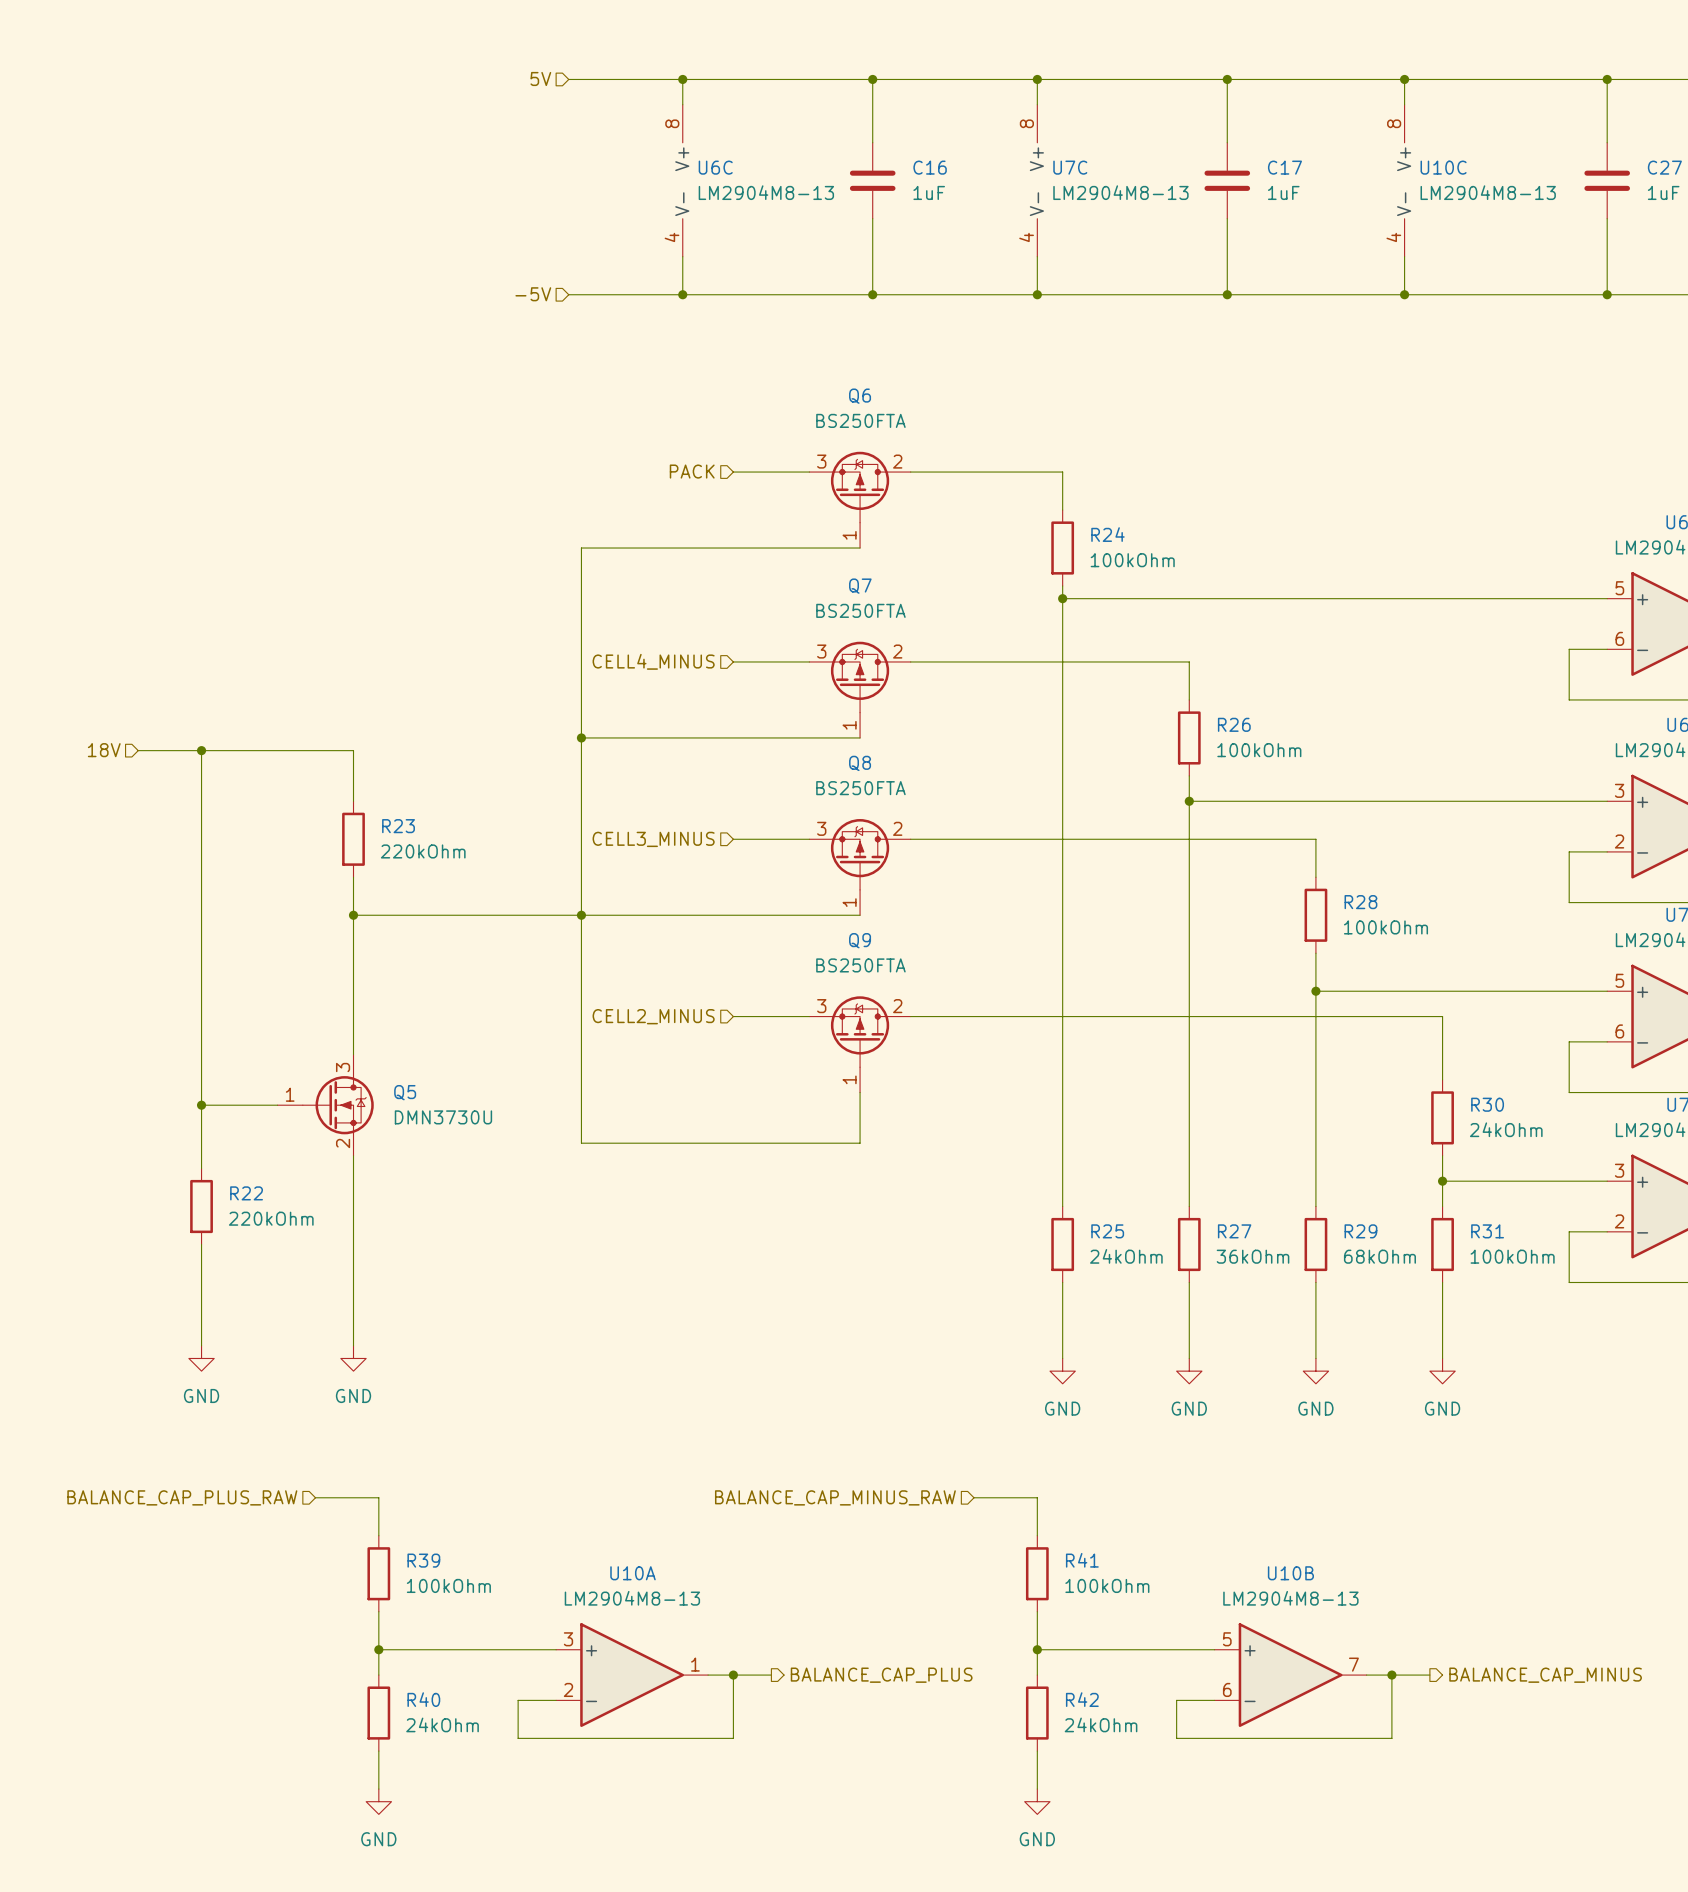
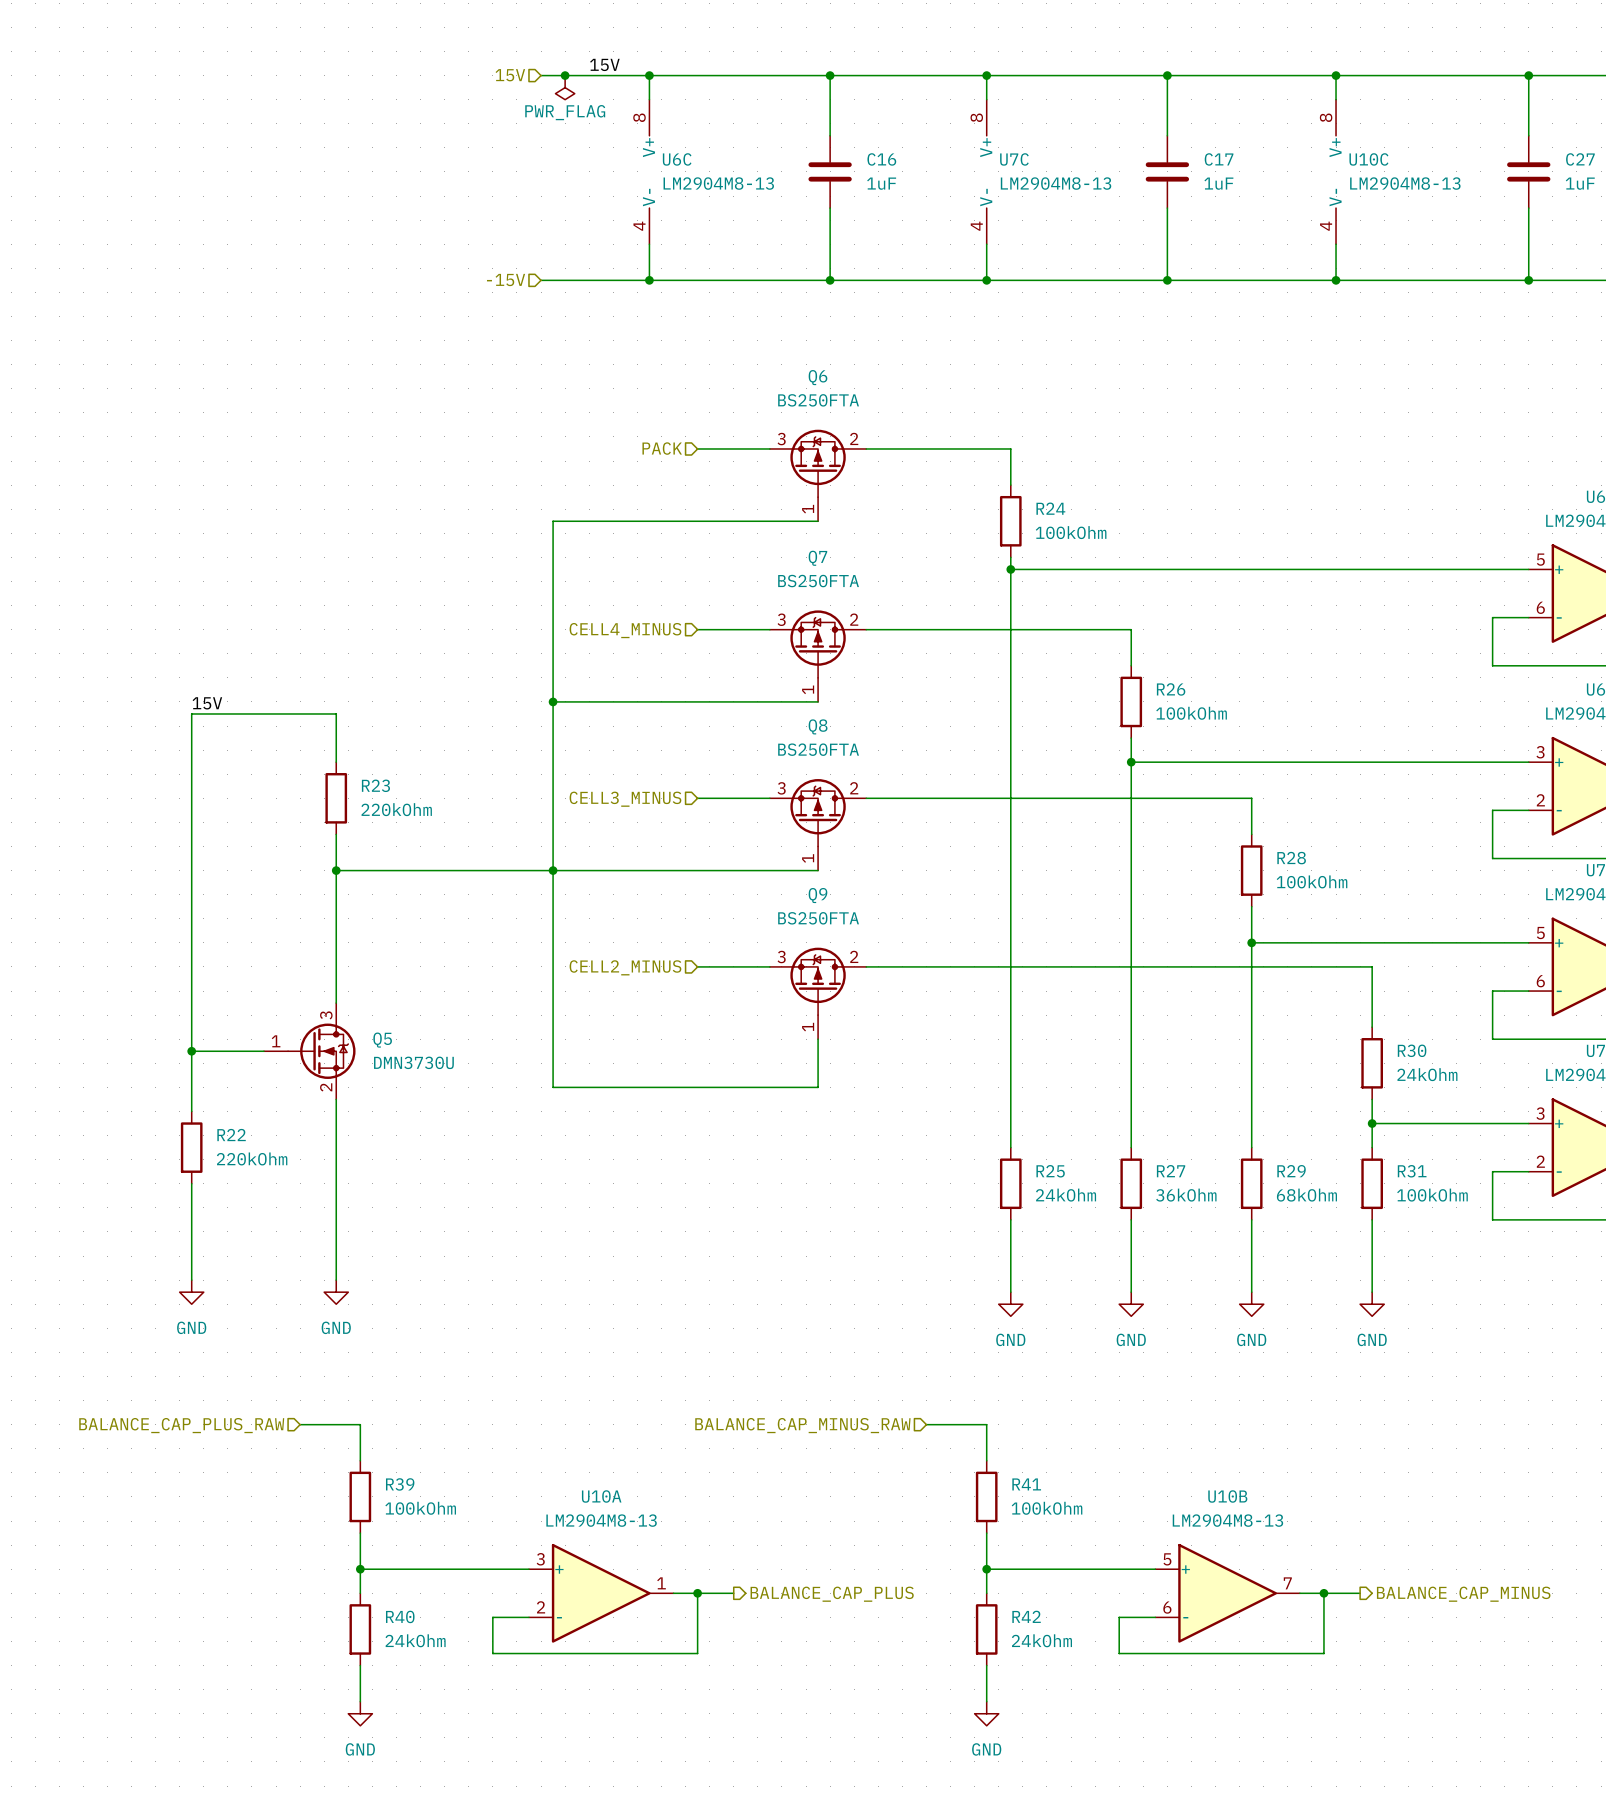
label: none -> 15V (604, 64)
hierarchical label: 5V (540, 78) -> 15V (510, 75)
junction: none -> (565, 75)
power symbol: none -> PWR_FLAG (565, 87)
hierarchical label: -5V (533, 294) -> -15V (506, 280)
label: none -> 15V (207, 703)
hierarchical label: 18V (104, 750) -> none
wire: (138, 750) (201, 750) -> none
junction: (201, 750) -> none

